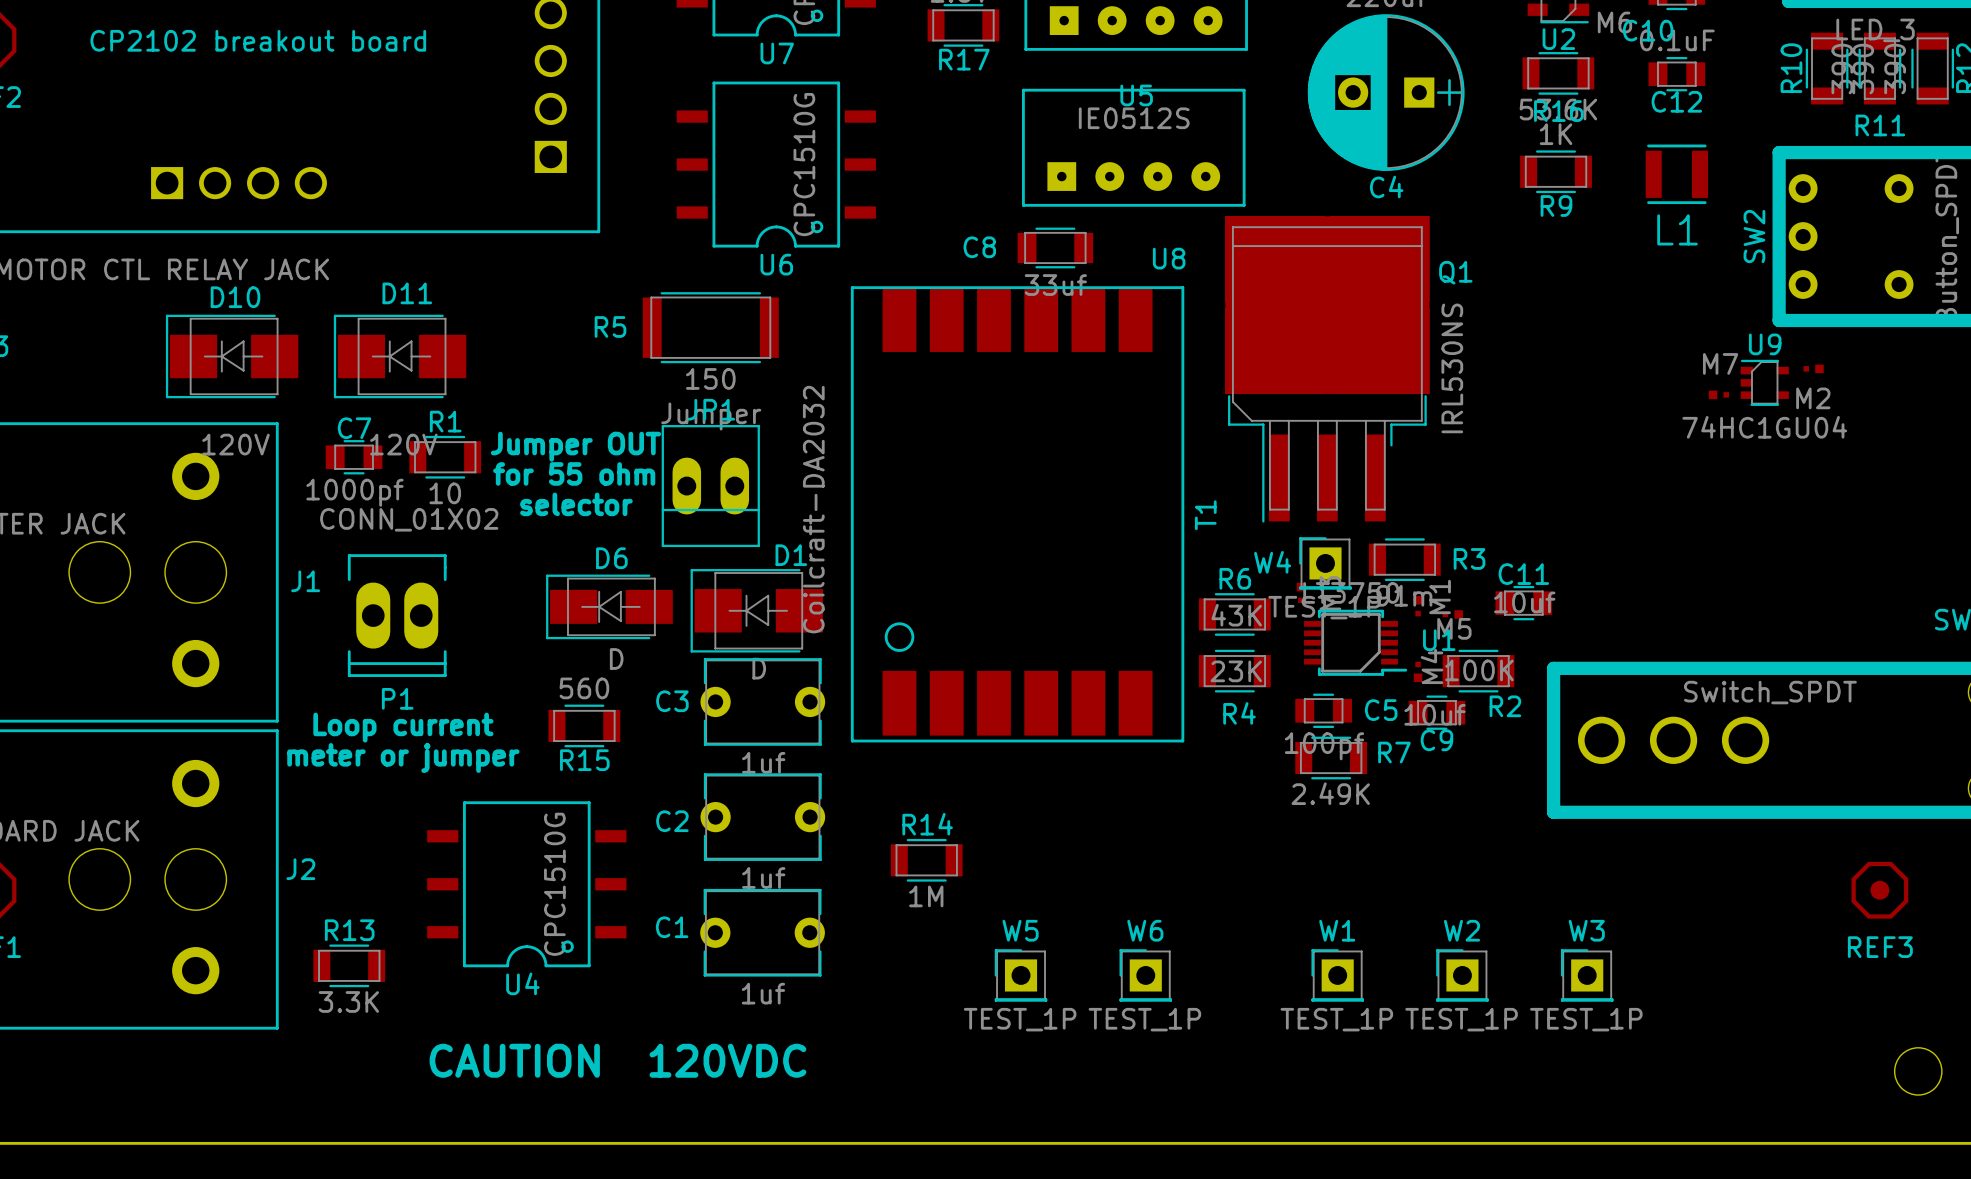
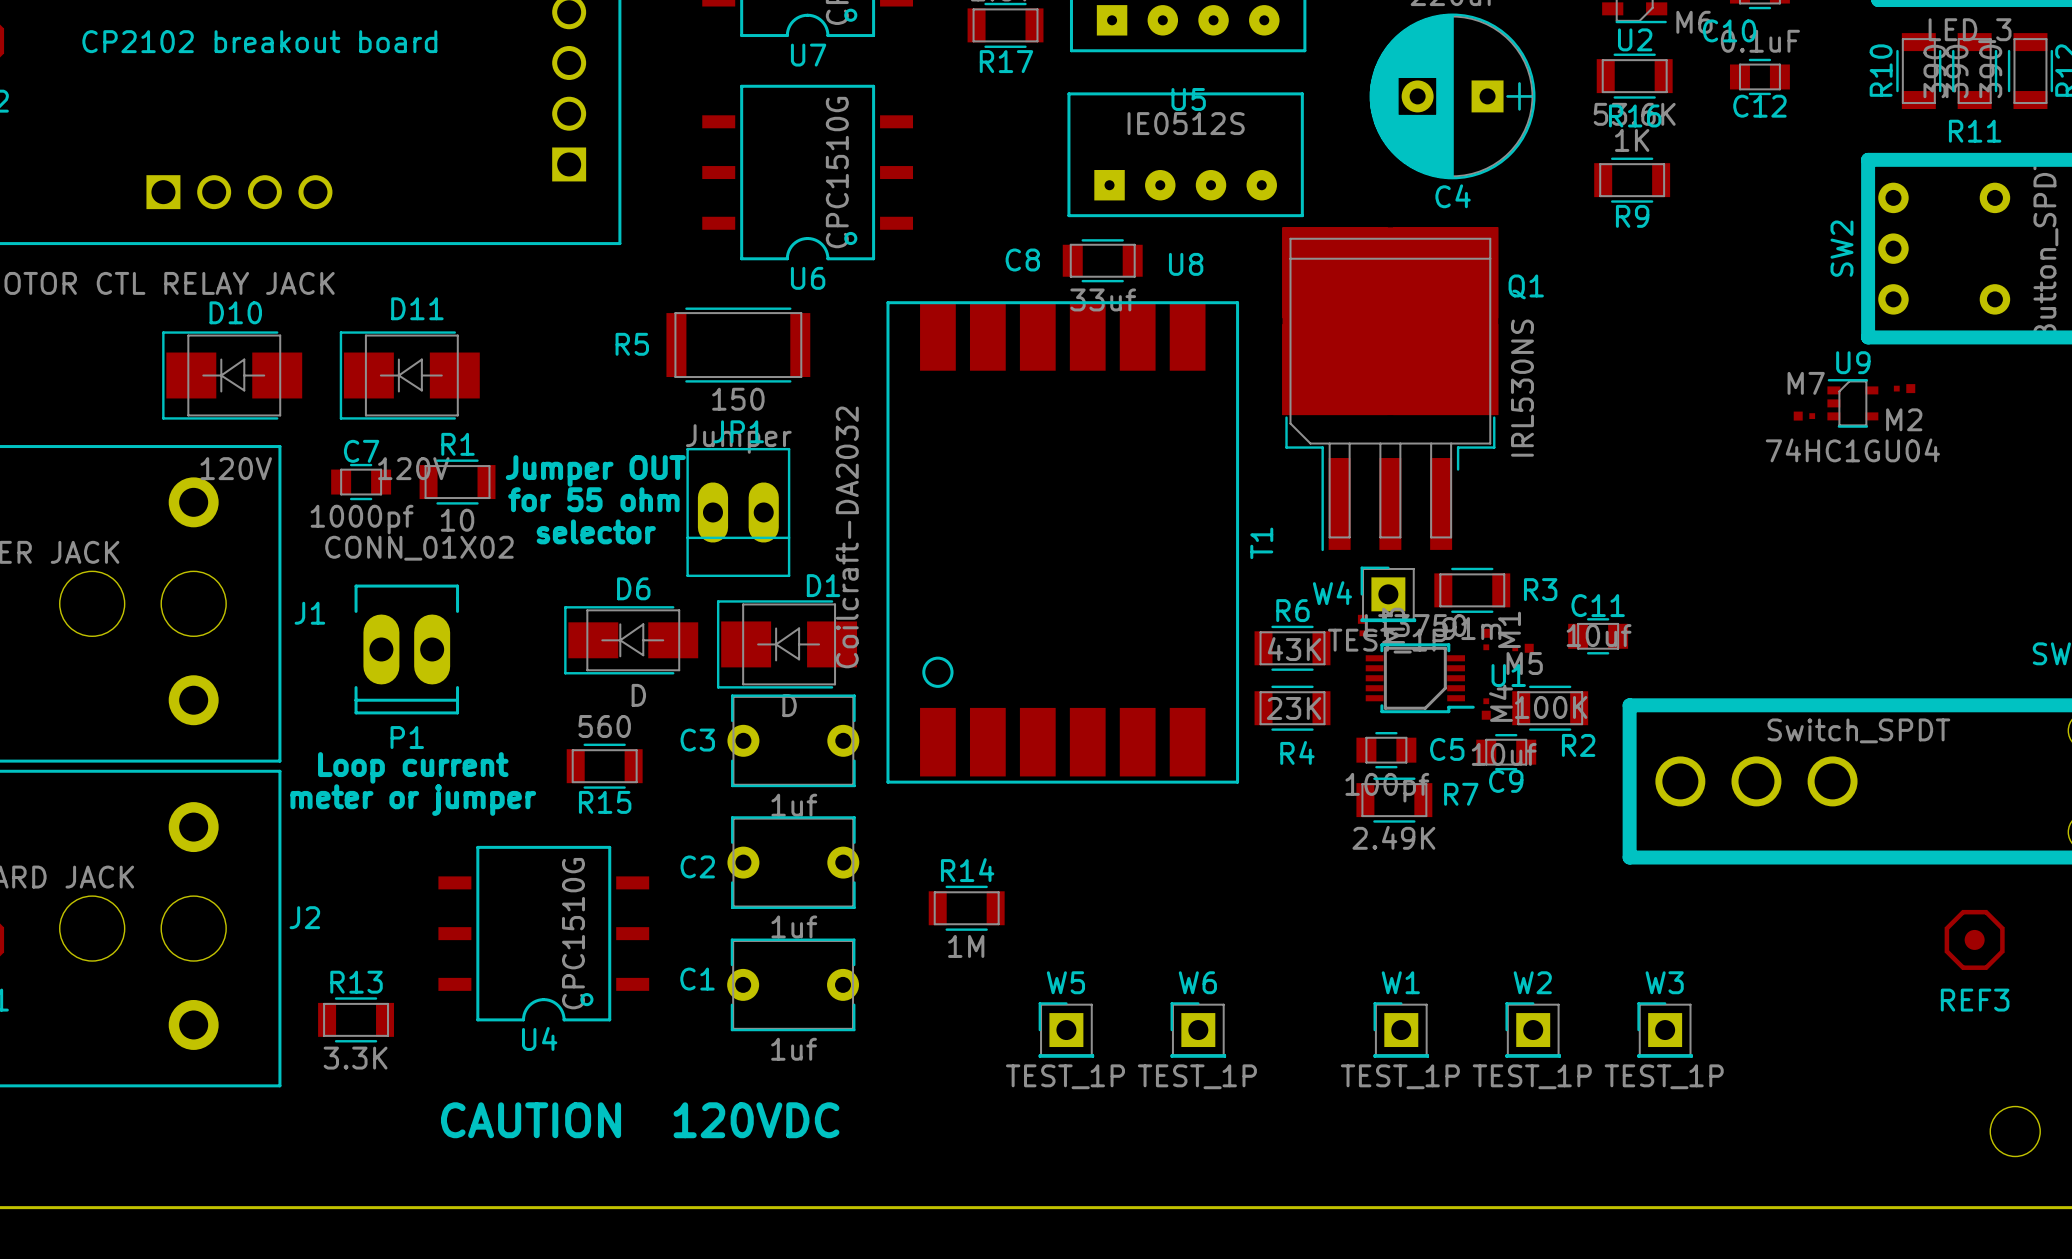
L1: (1676, 174) -> none
U8 name position: U8 (1169, 258) -> U8 (1186, 264)

